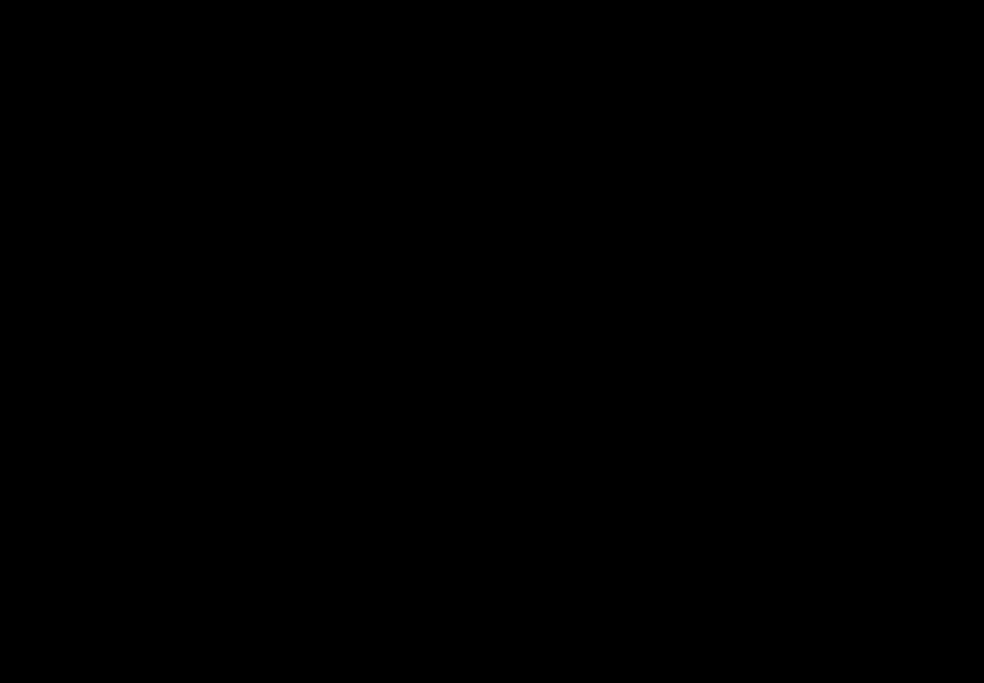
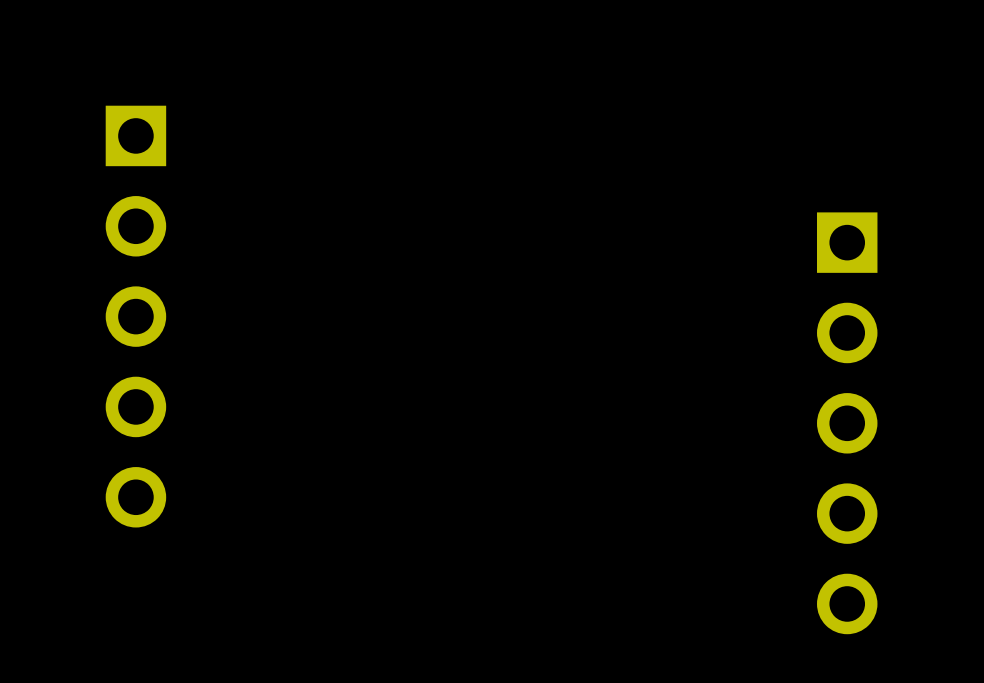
part: none -> (135, 316)
part: none -> (847, 423)

